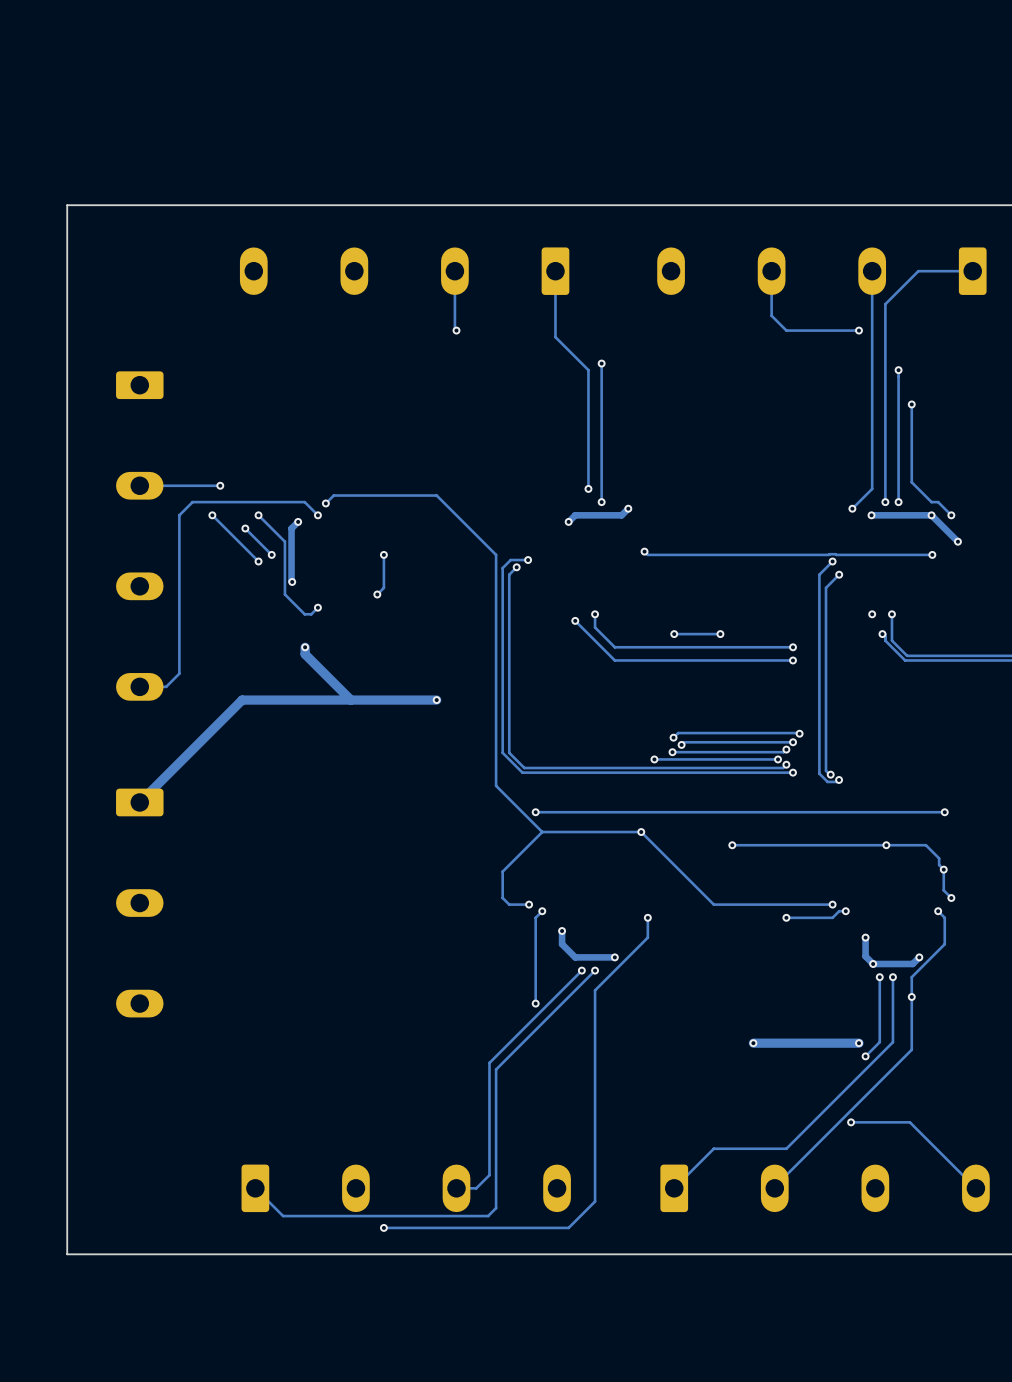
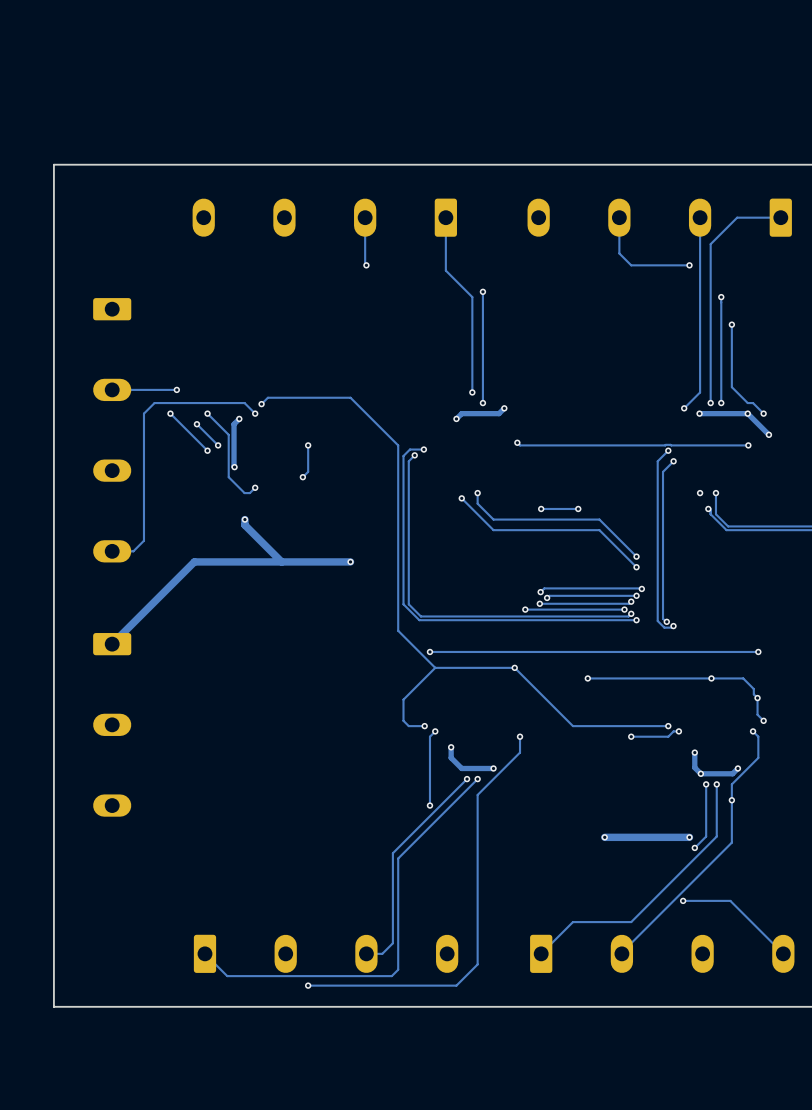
track: (793, 647) (746, 647) -> (636, 556) (599, 519)
via: (793, 647) -> none
track: (793, 660) (746, 660) -> (636, 567) (599, 530)
via: (793, 660) -> none
via: none -> (636, 556)
via: none -> (636, 567)

